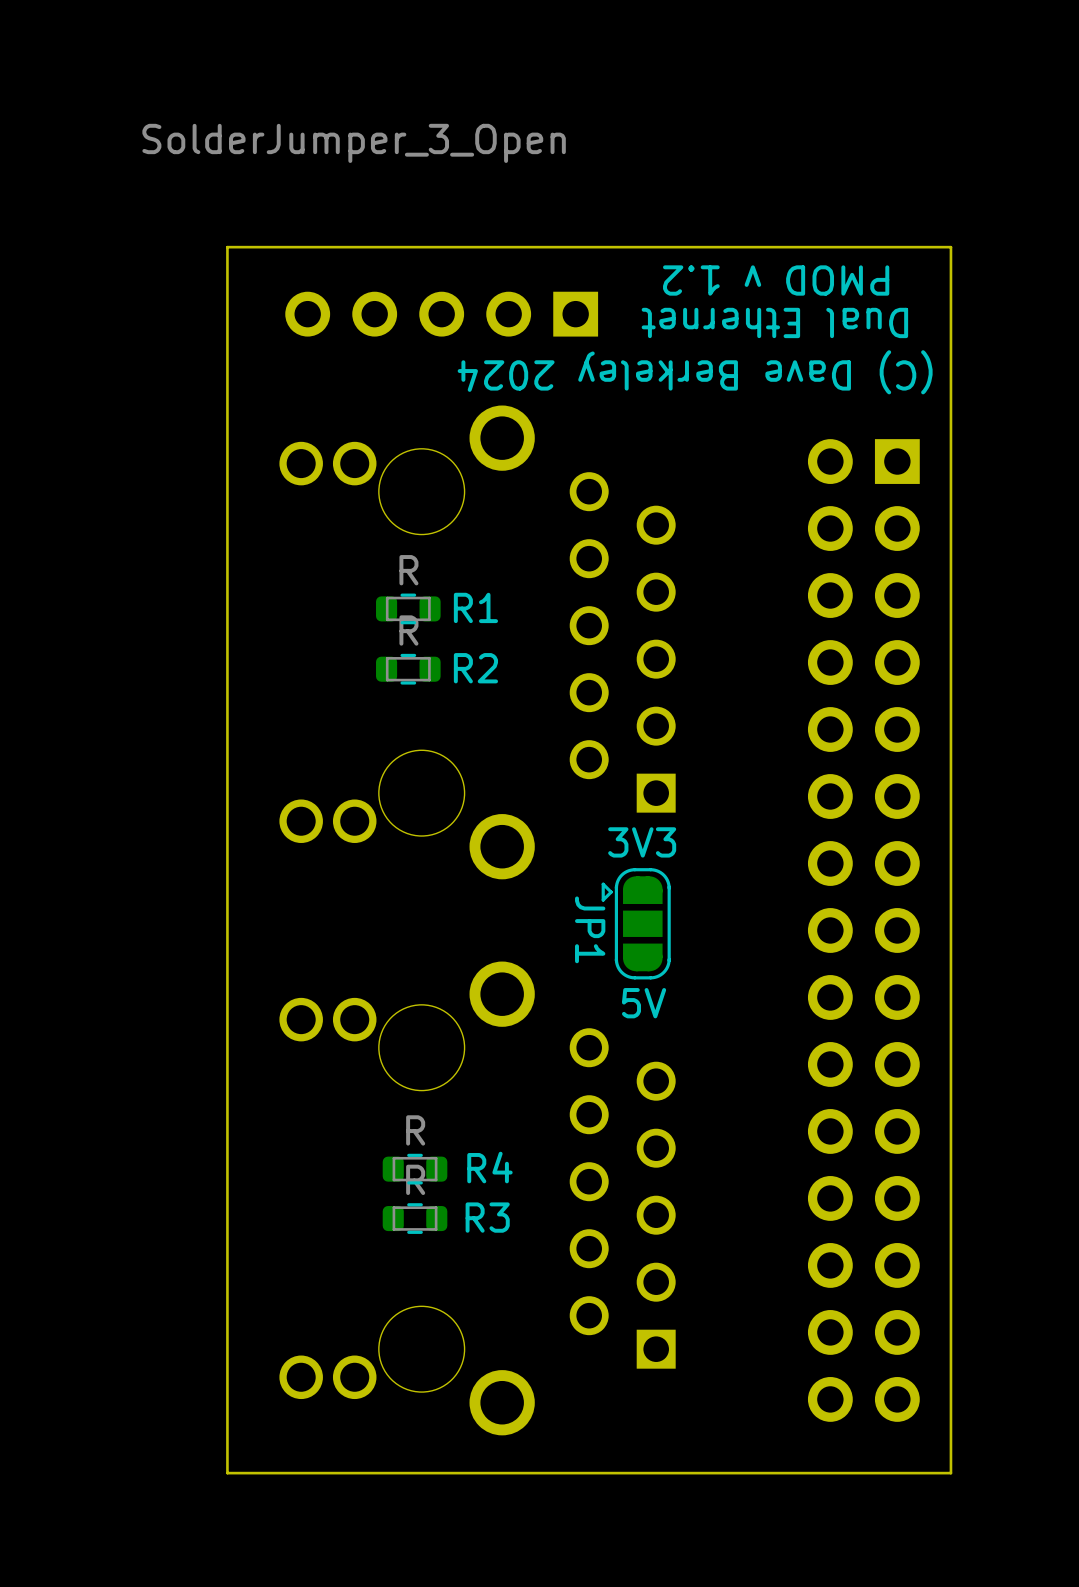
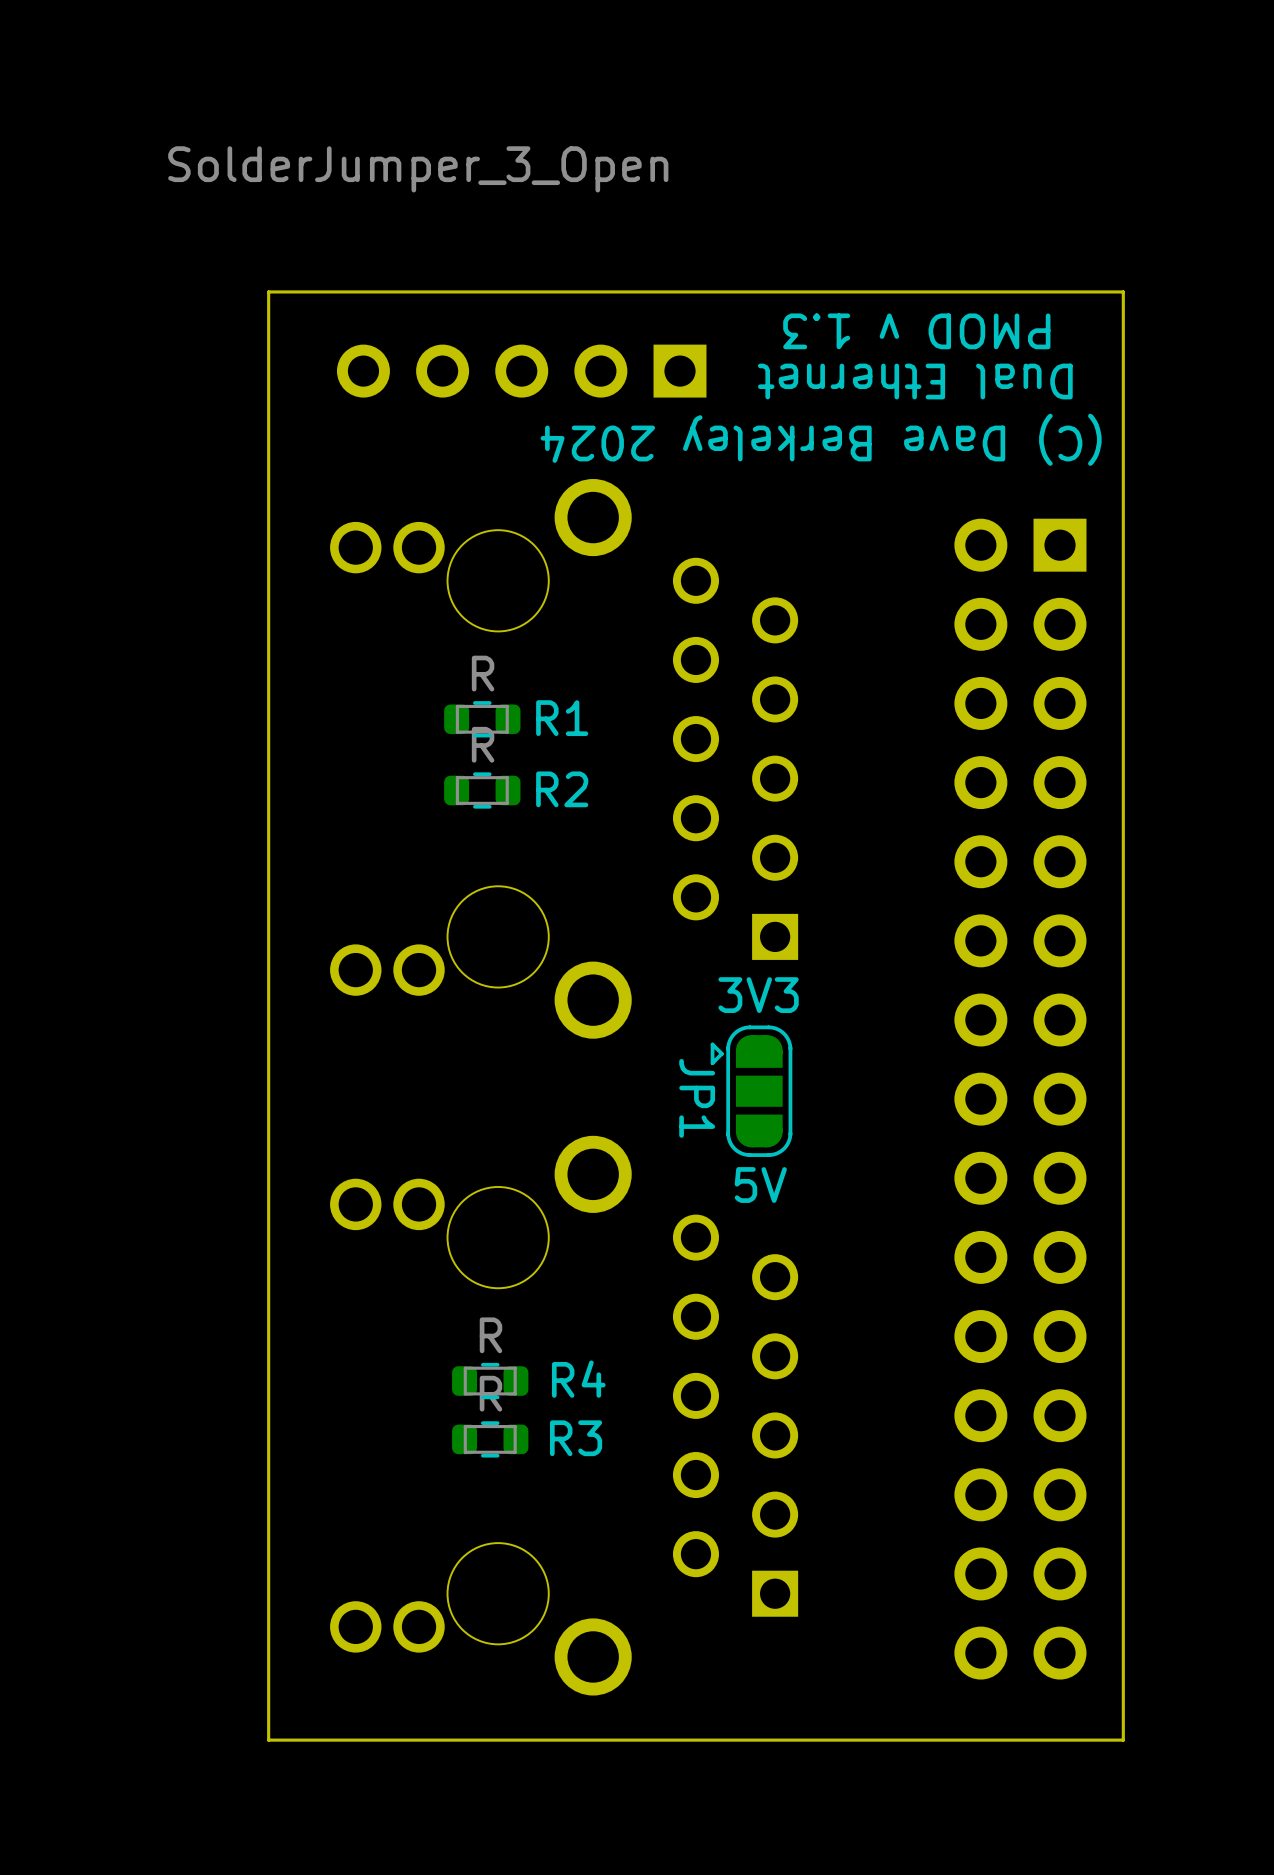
text: PMOD v 1.2 (776, 280) -> PMOD v 1.3 (916, 331)

